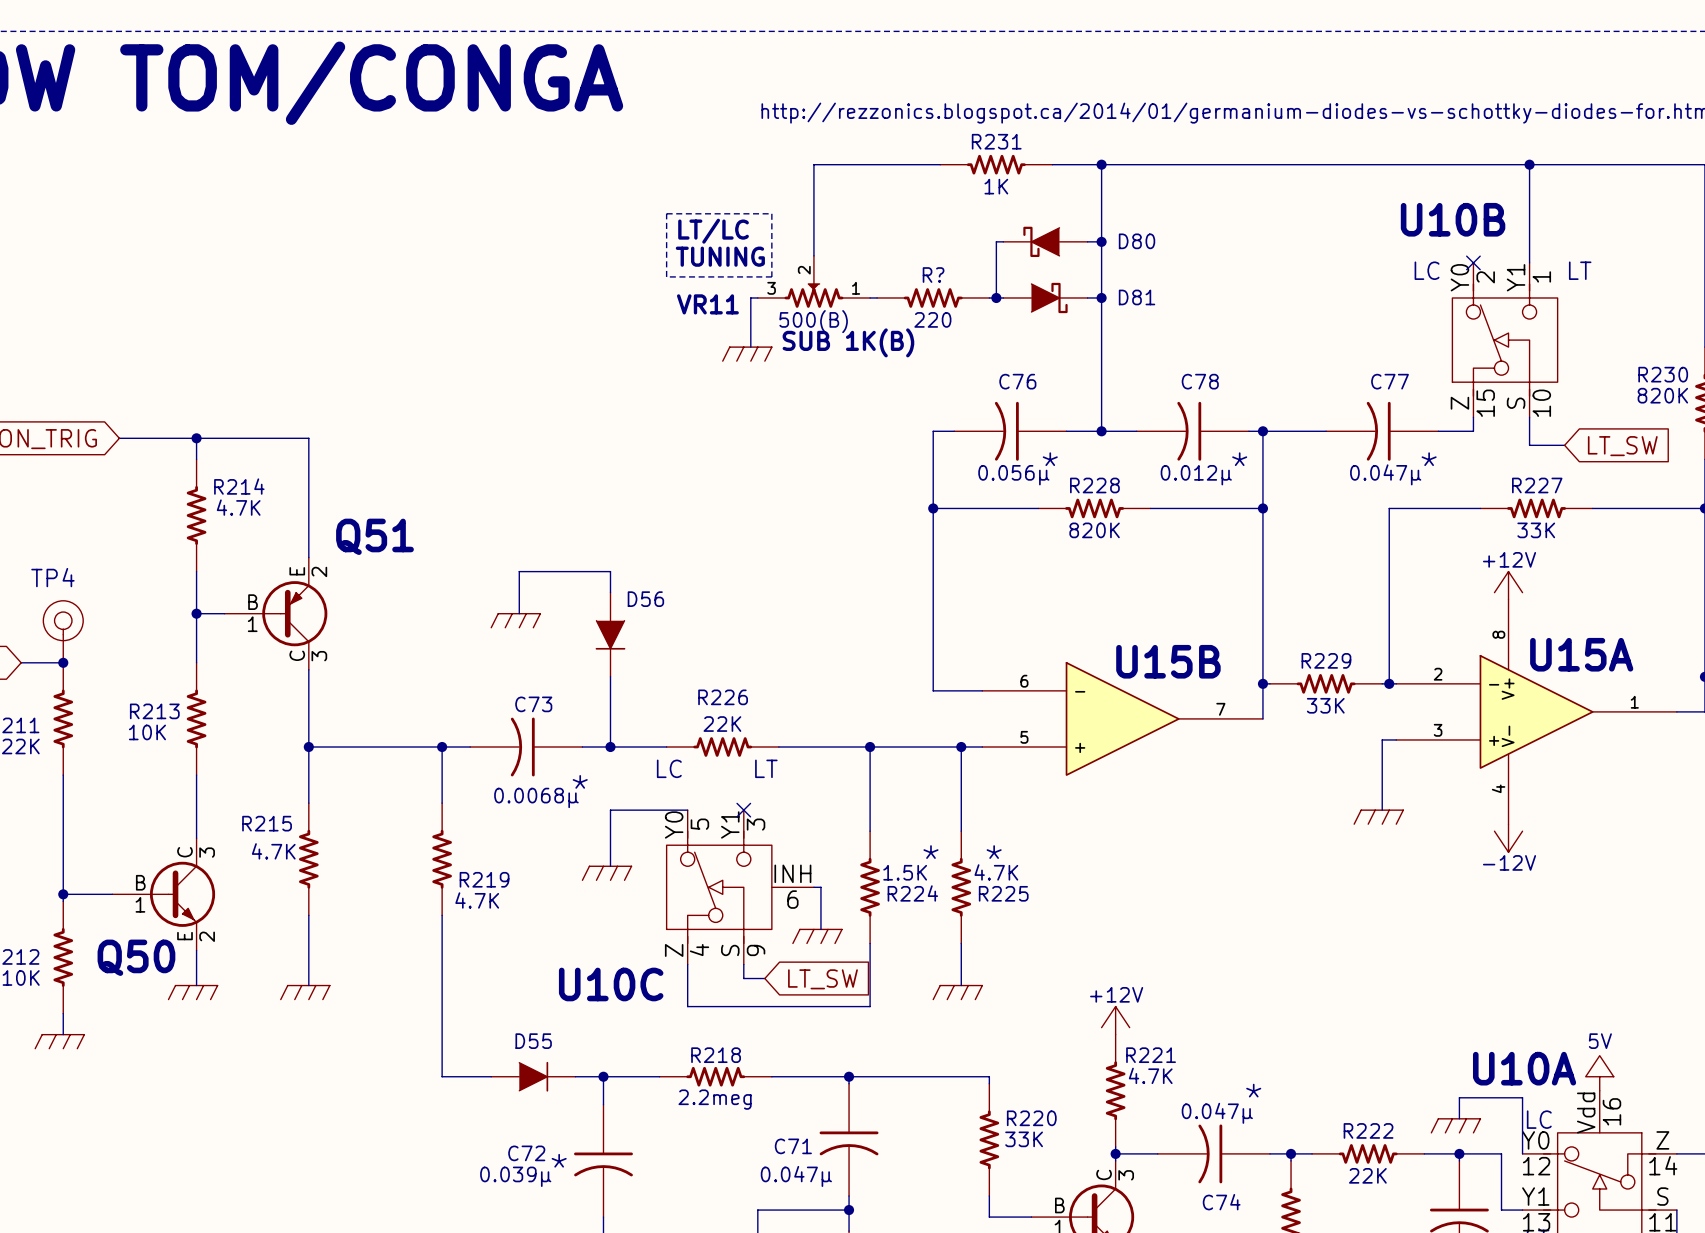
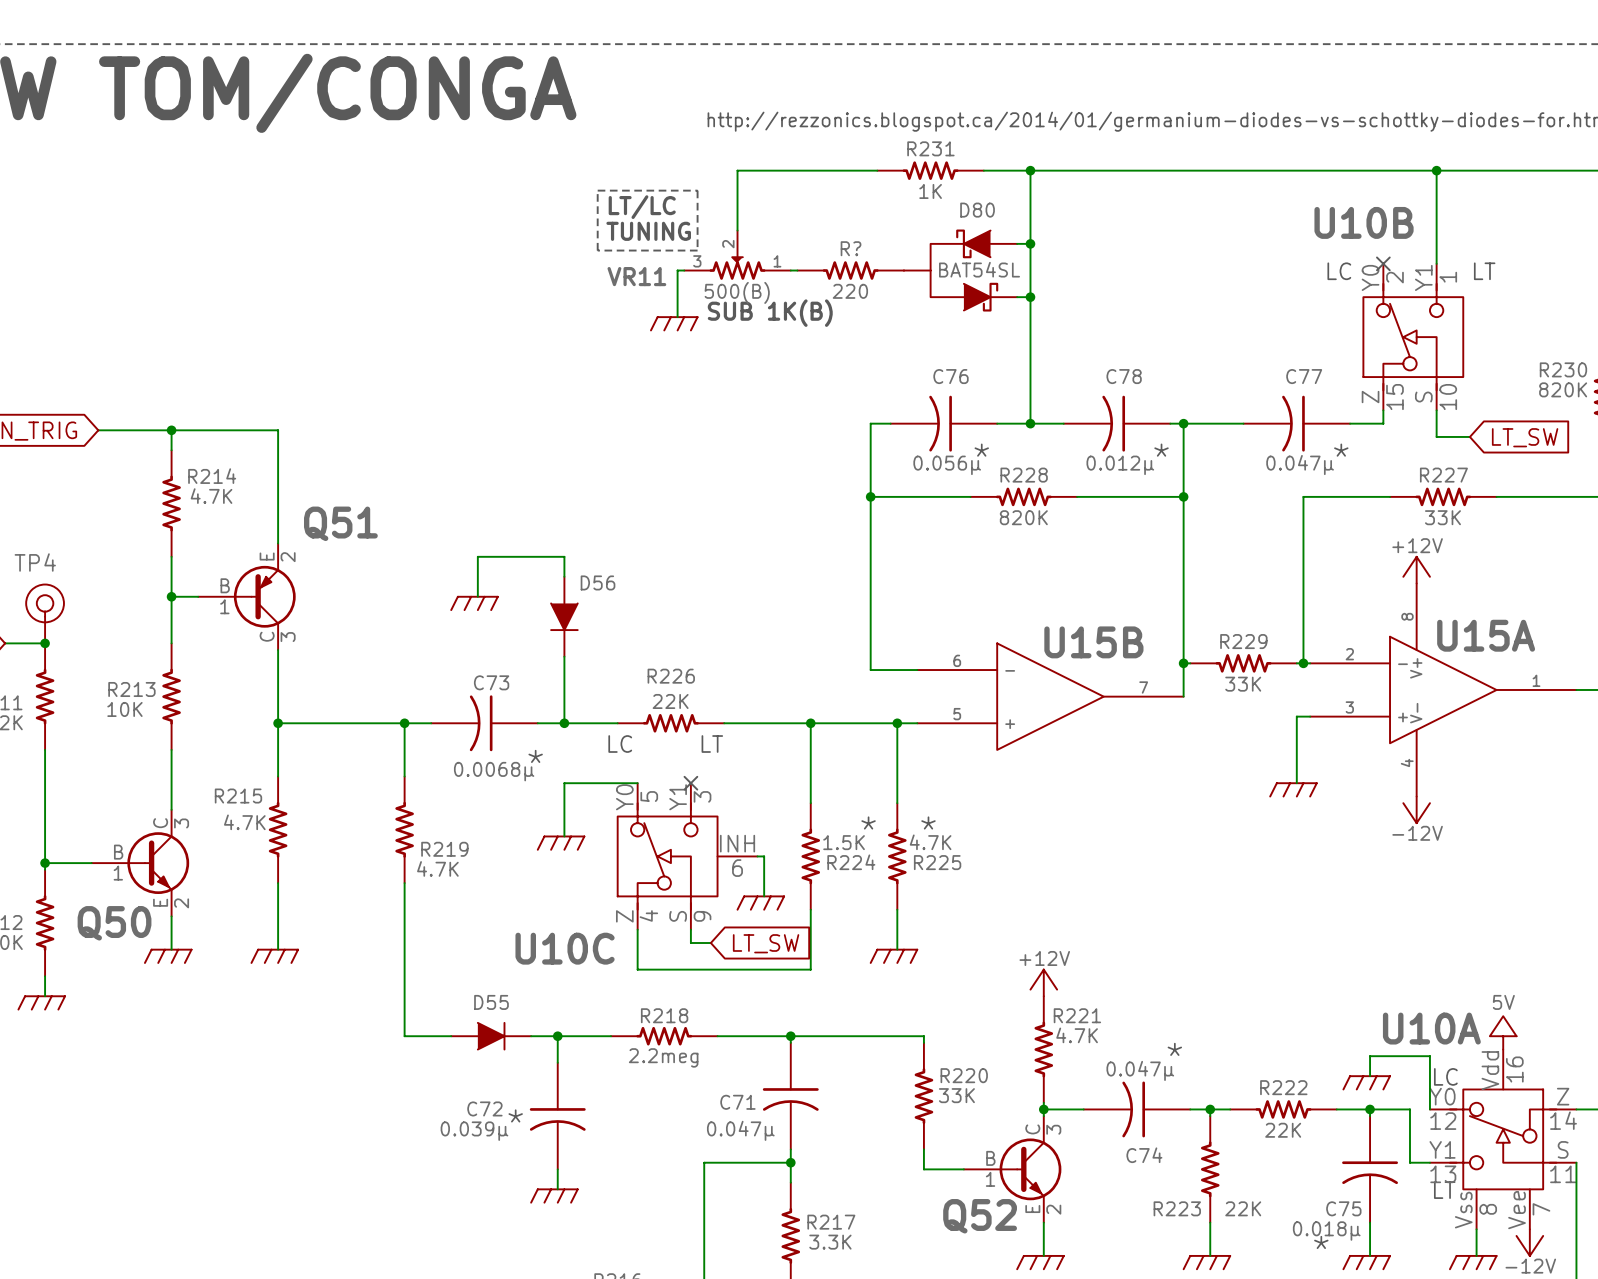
wire: (813, 164) (813, 255) -> (757, 170) (737, 170) (737, 230)
line: (666, 213) (771, 213) (771, 276) (666, 276) (666, 213) -> (597, 190) (697, 190) (697, 250) (597, 250) (597, 190)
D80 symbol: [1003, 226, 1088, 258] -> [903, 229, 1018, 312]
text position: LT/LC (713, 231) -> LT/LC (642, 207)
D80 name position: D80 (1137, 241) -> D80 (977, 210)
text position: TUNING (720, 256) -> TUNING (648, 231)
D80 value: none -> BAT54SL (979, 269)
VR11 position: (813, 281) -> (737, 255)
wire: (757, 297) (750, 297) (750, 347) -> (684, 270) (677, 270) (677, 317)
wire: (870, 297) (877, 297) -> (790, 270) (797, 270)
R? position: (933, 297) -> (850, 270)
junction: (996, 297) -> none
D81: (1045, 297) -> none
text position: SUB 1K(B) (848, 342) -> SUB 1K(B) (770, 313)
power symbol position: (747, 354) -> (674, 323)

